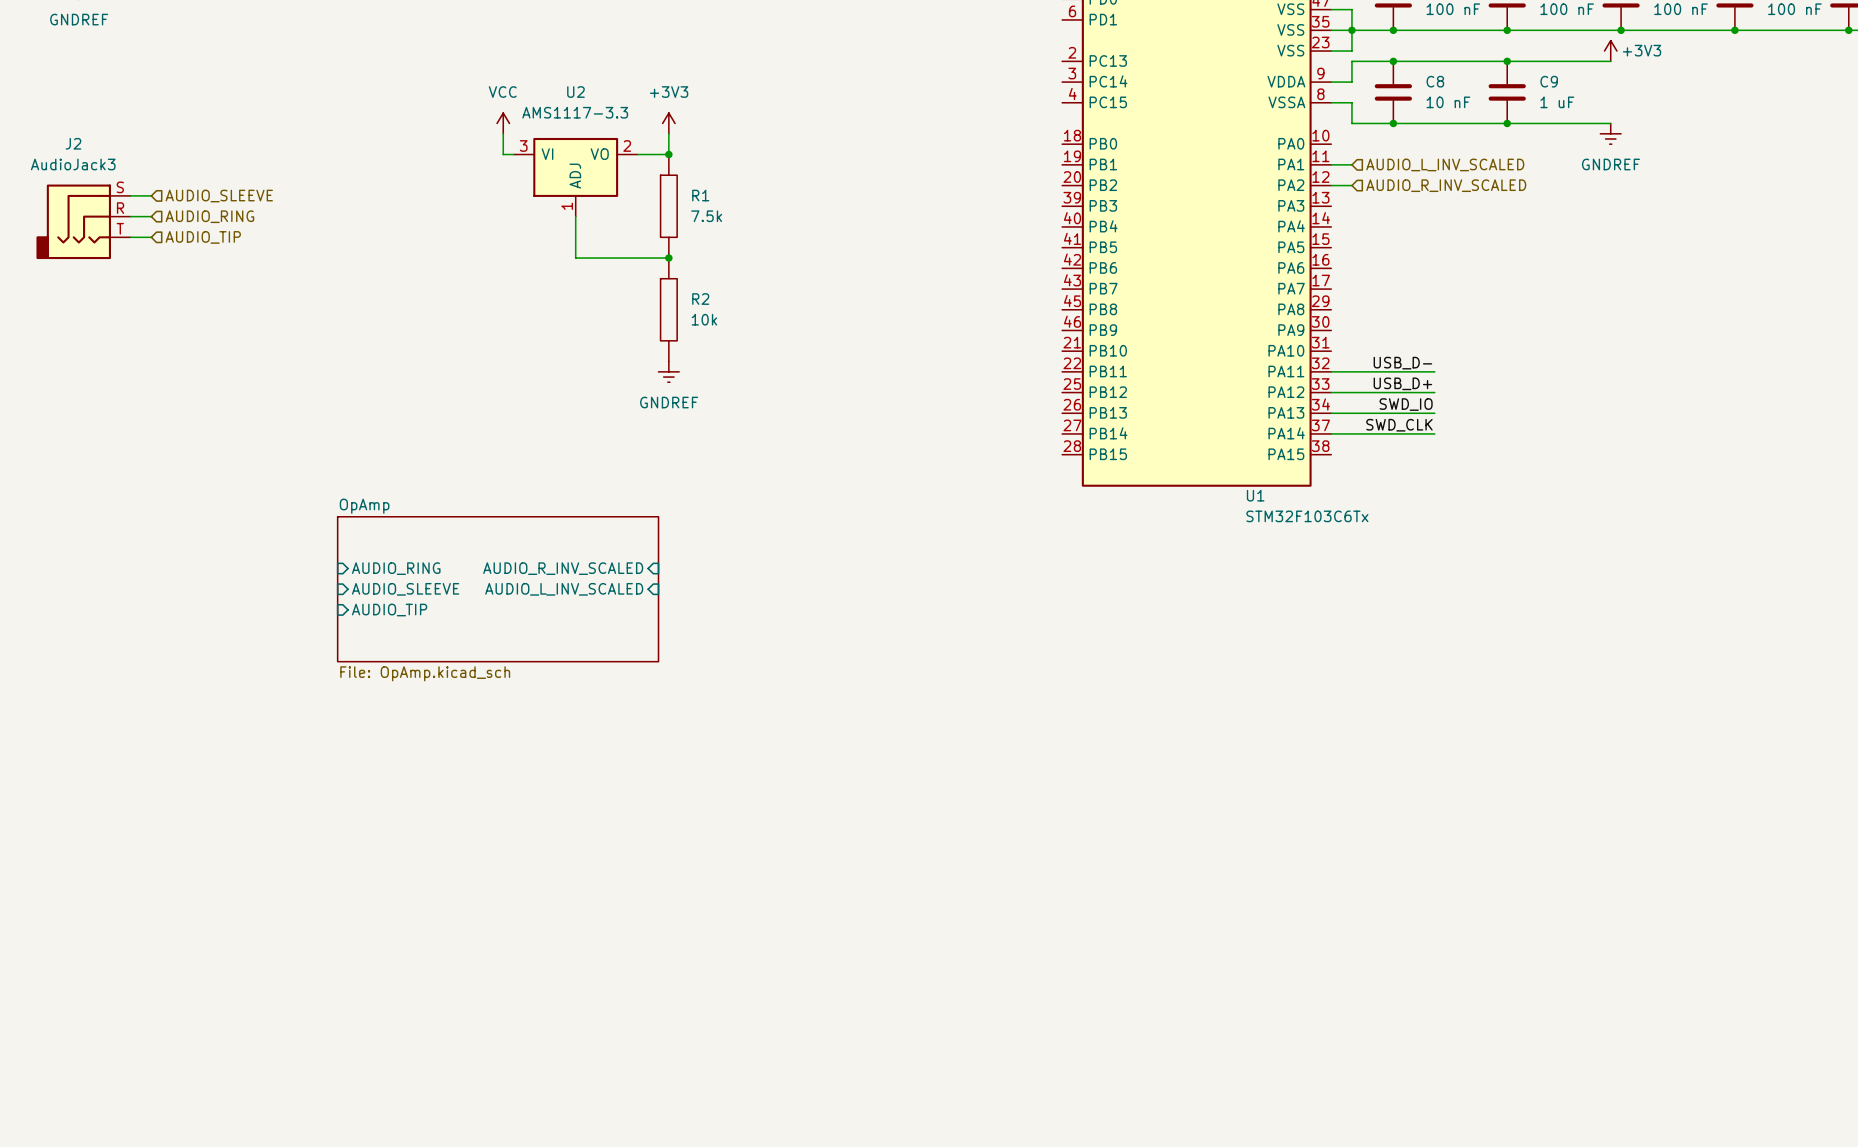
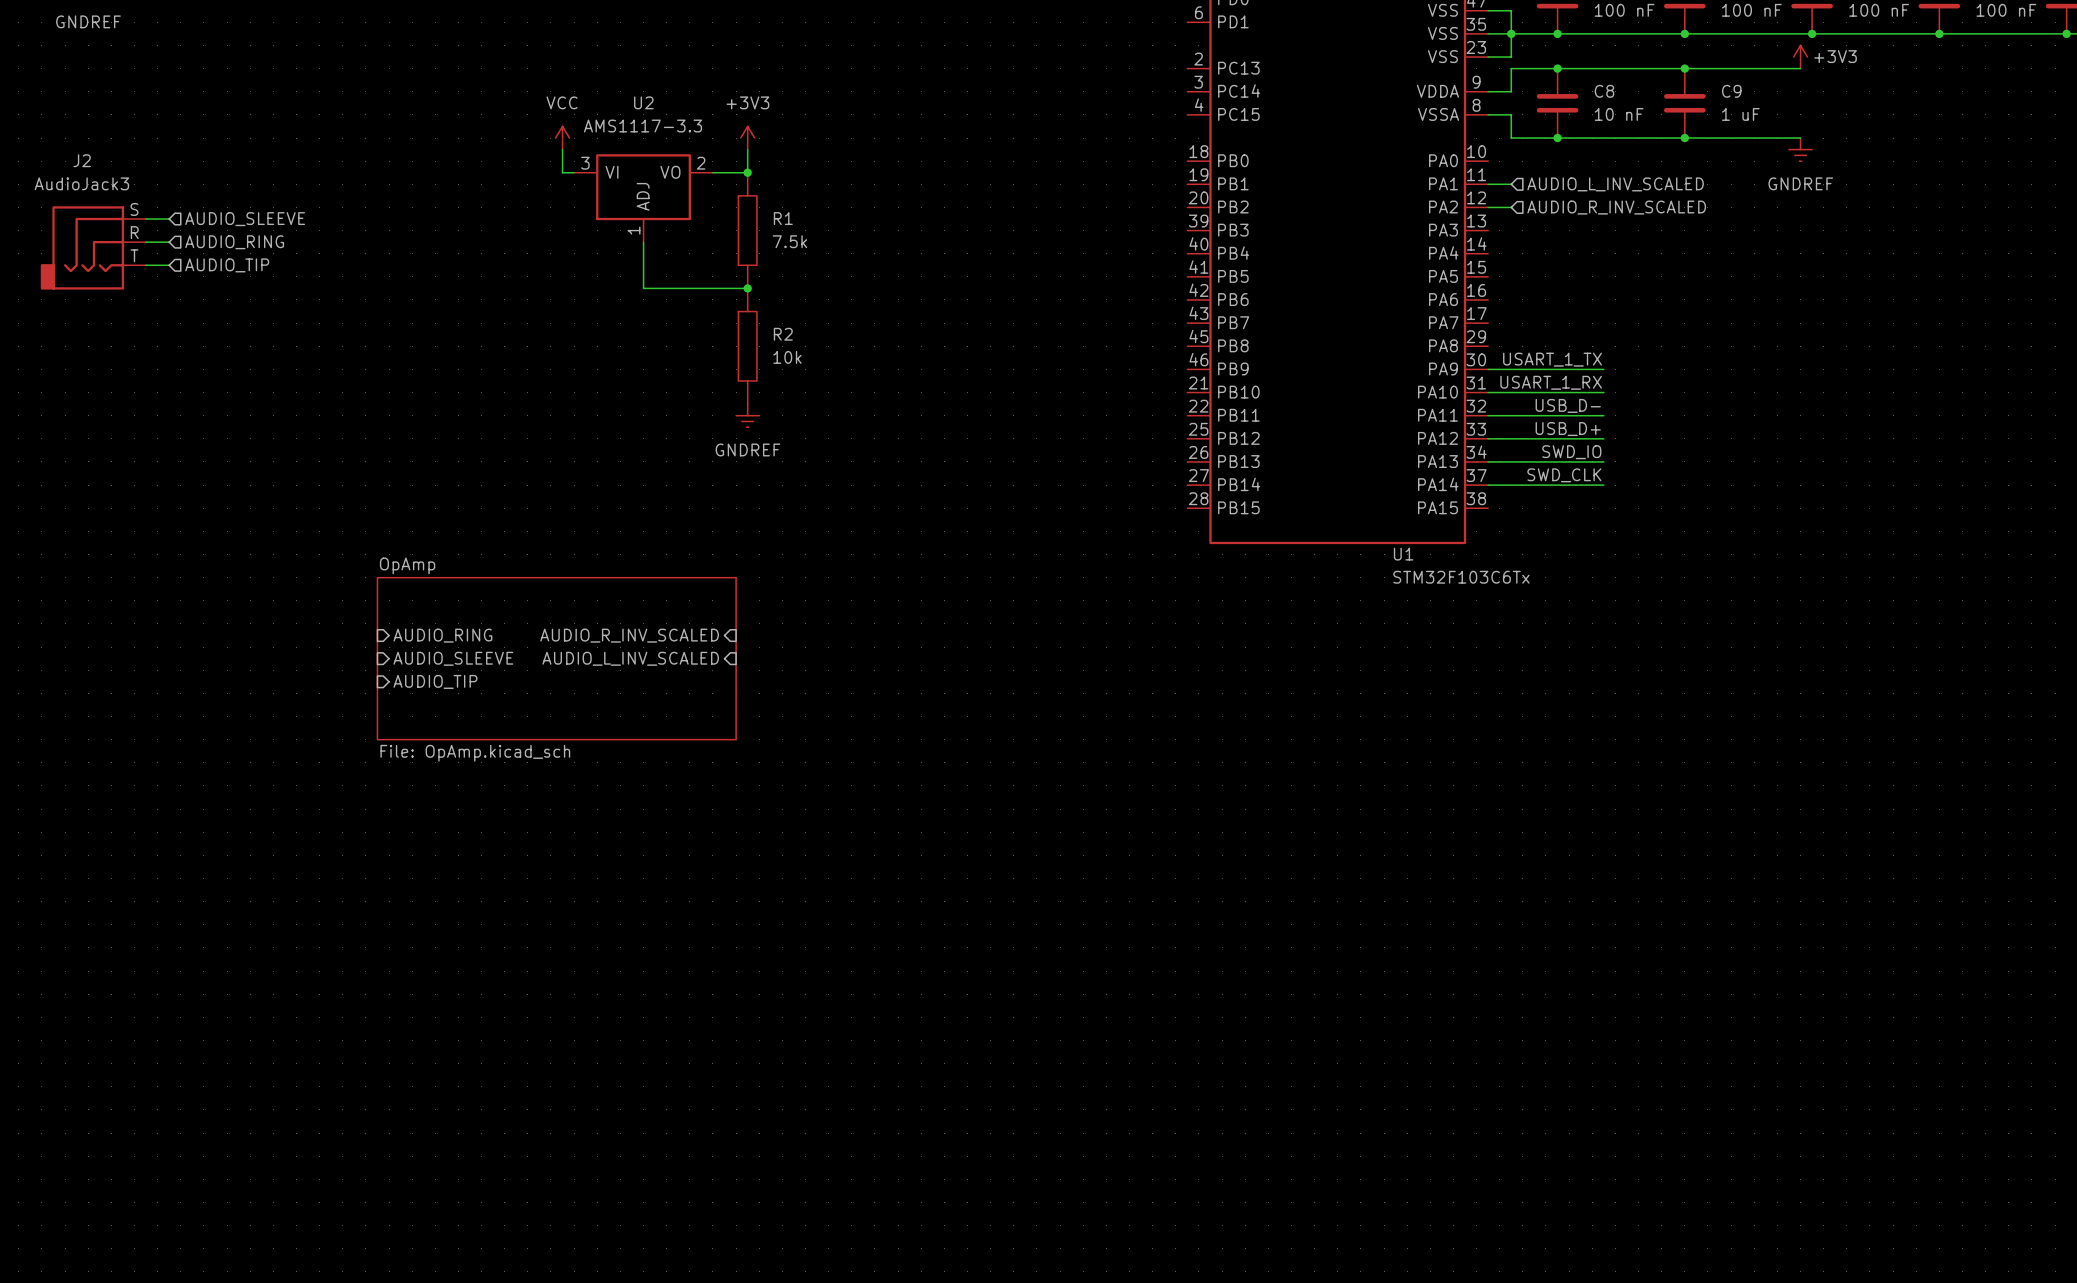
label: none -> USART_1_TX (1552, 359)
wire: none -> (1488, 369) (1603, 369)
label: none -> USART_1_RX (1551, 382)
wire: none -> (1488, 392) (1603, 392)

